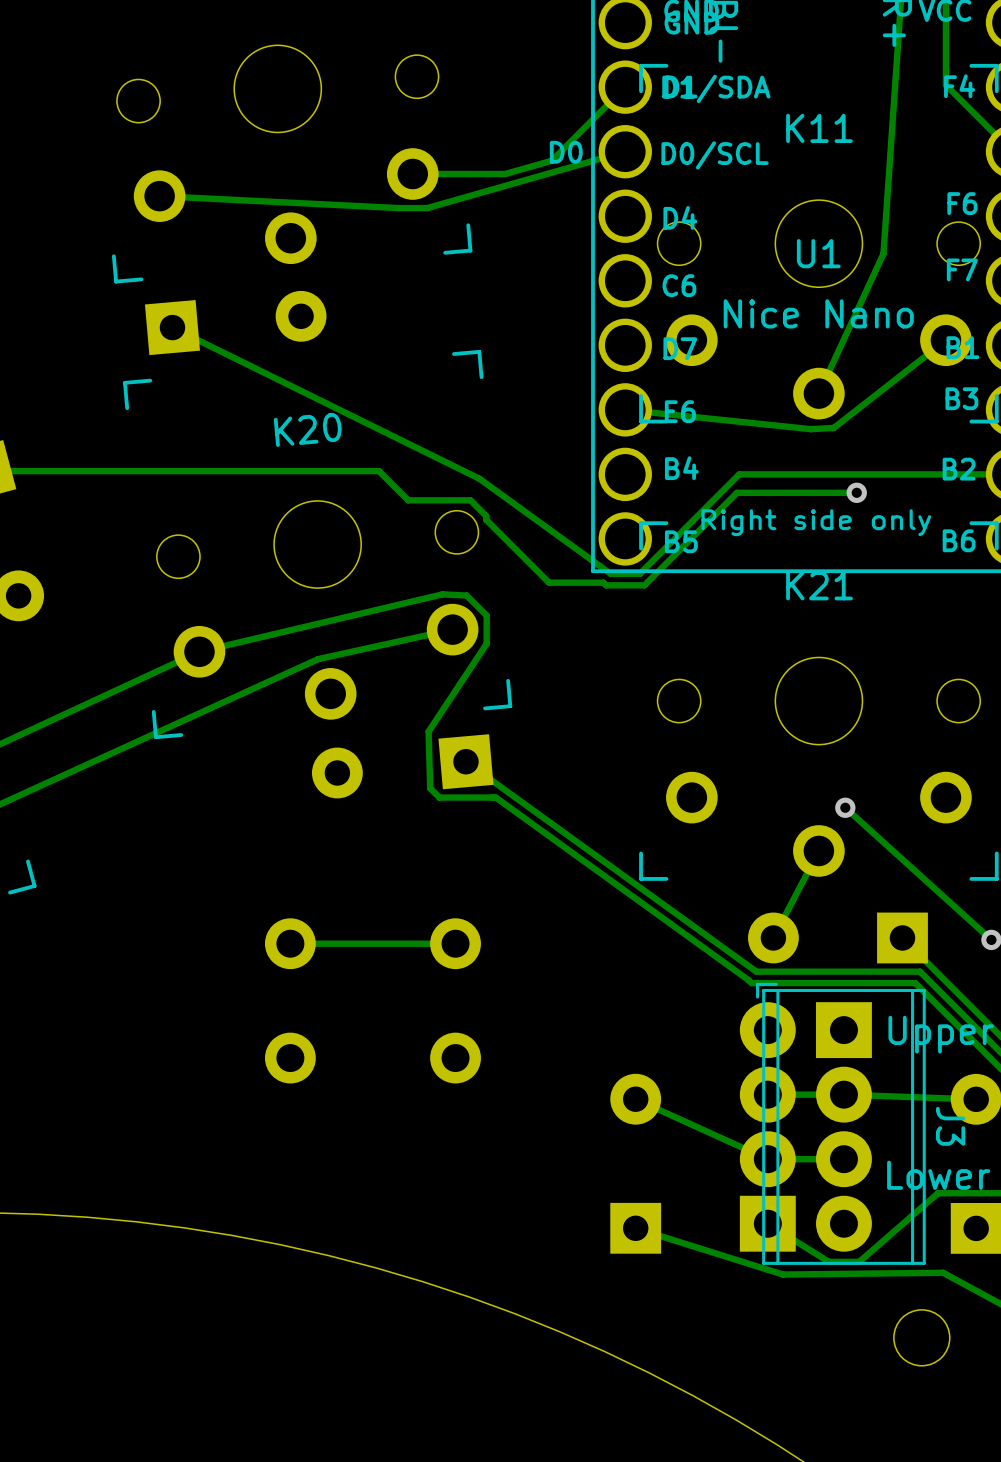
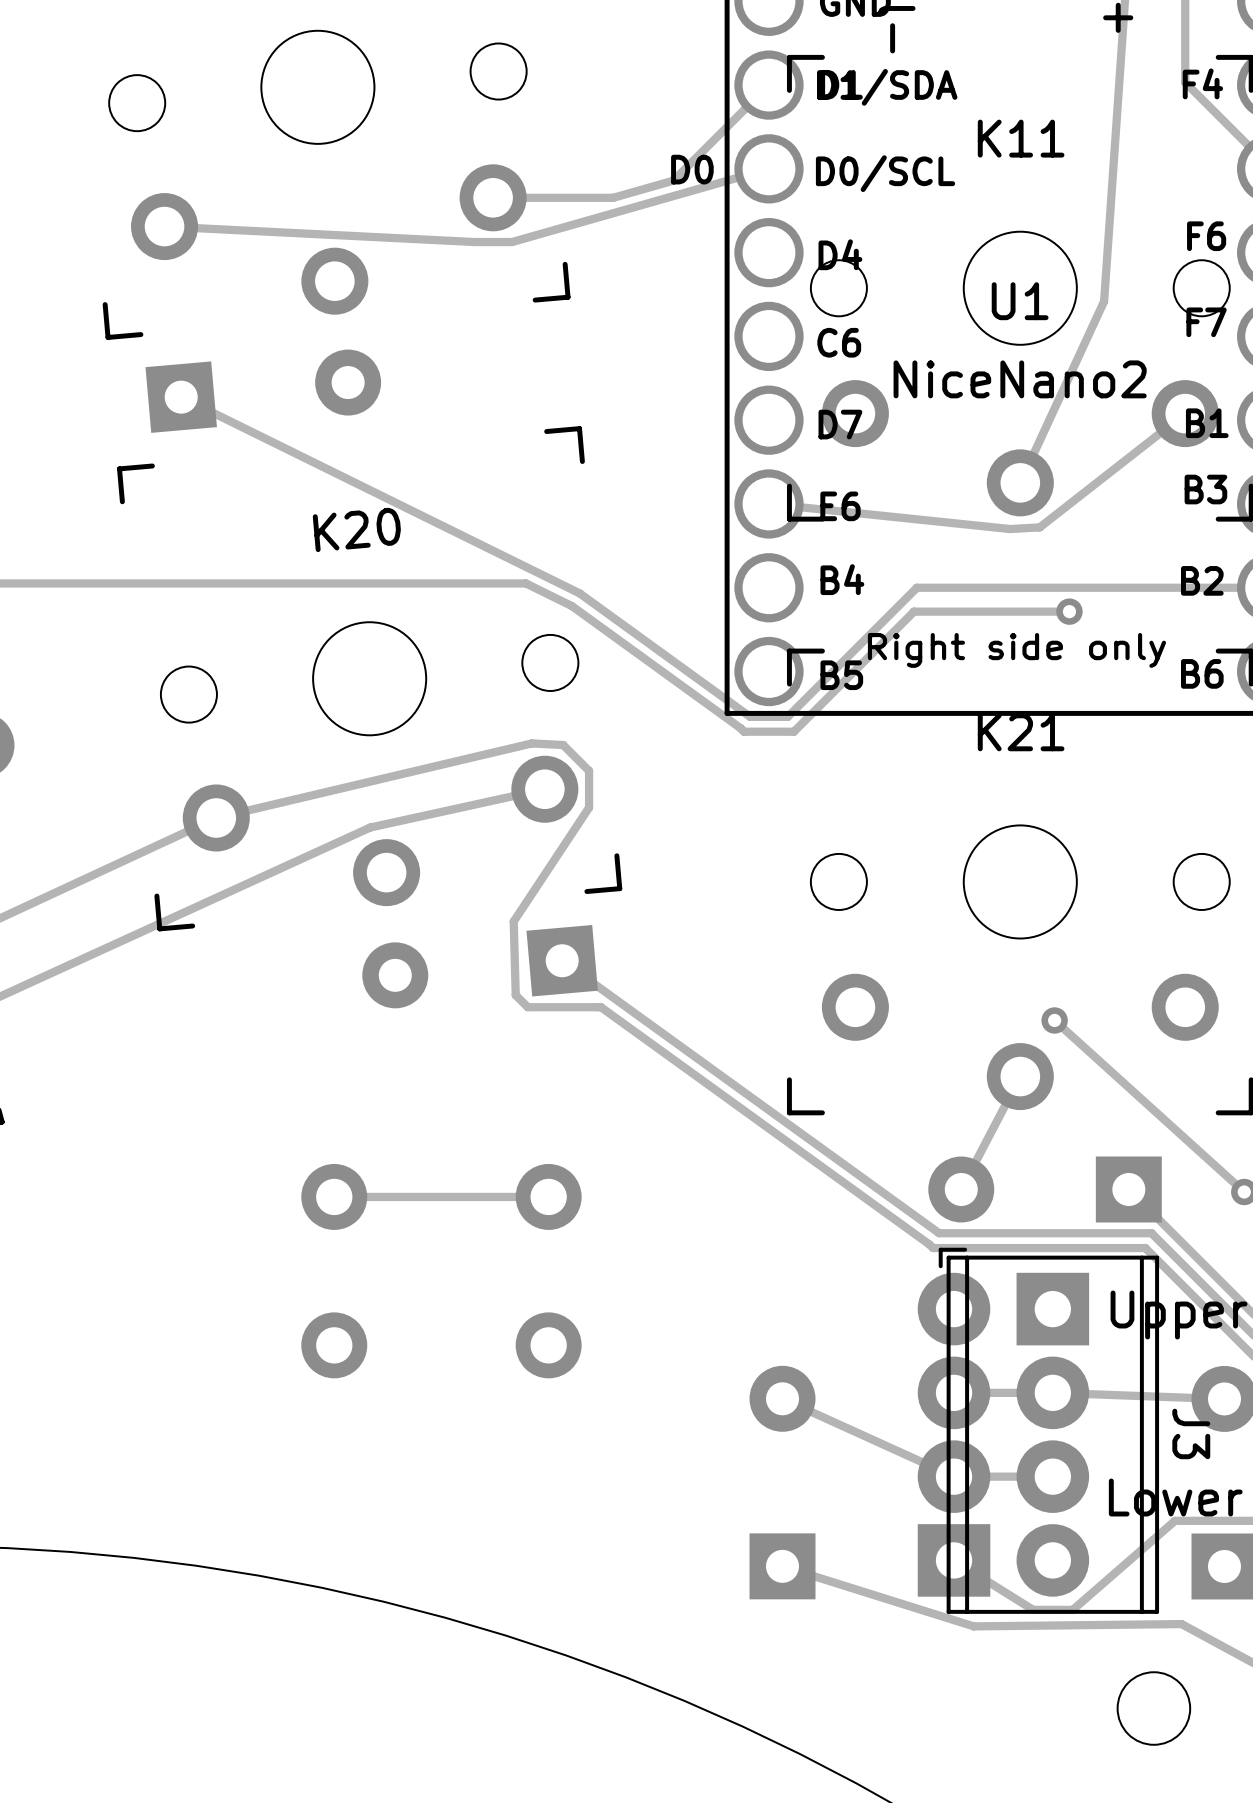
U1 value: Nice Nano (818, 313) -> NiceNano2 (1020, 379)
track: (379, 471) (408, 500) (470, 500) (486, 516) (486, 519) (549, 582) (603, 582) -> (449, 583) (525, 583) (571, 606) (740, 728)

